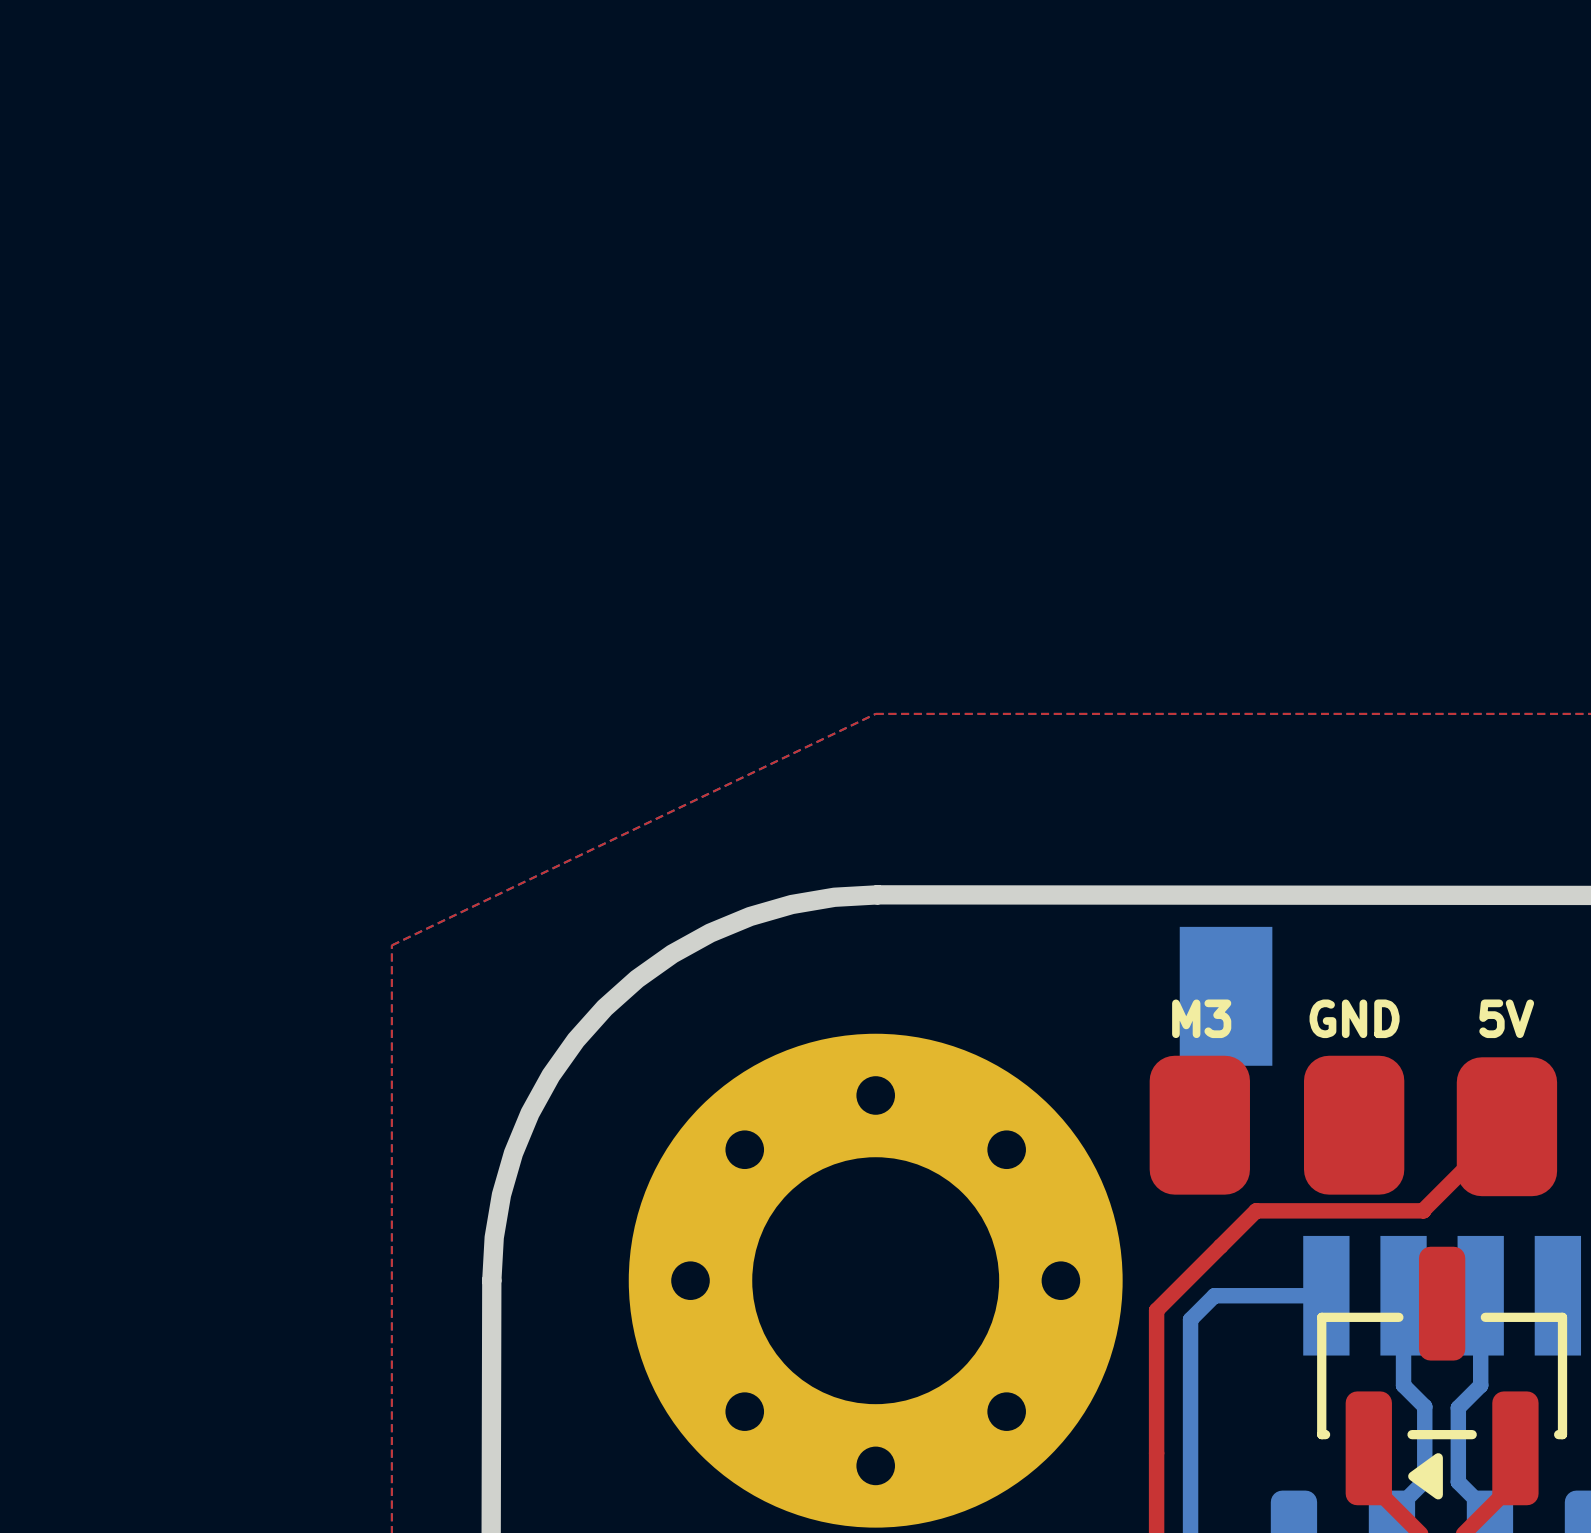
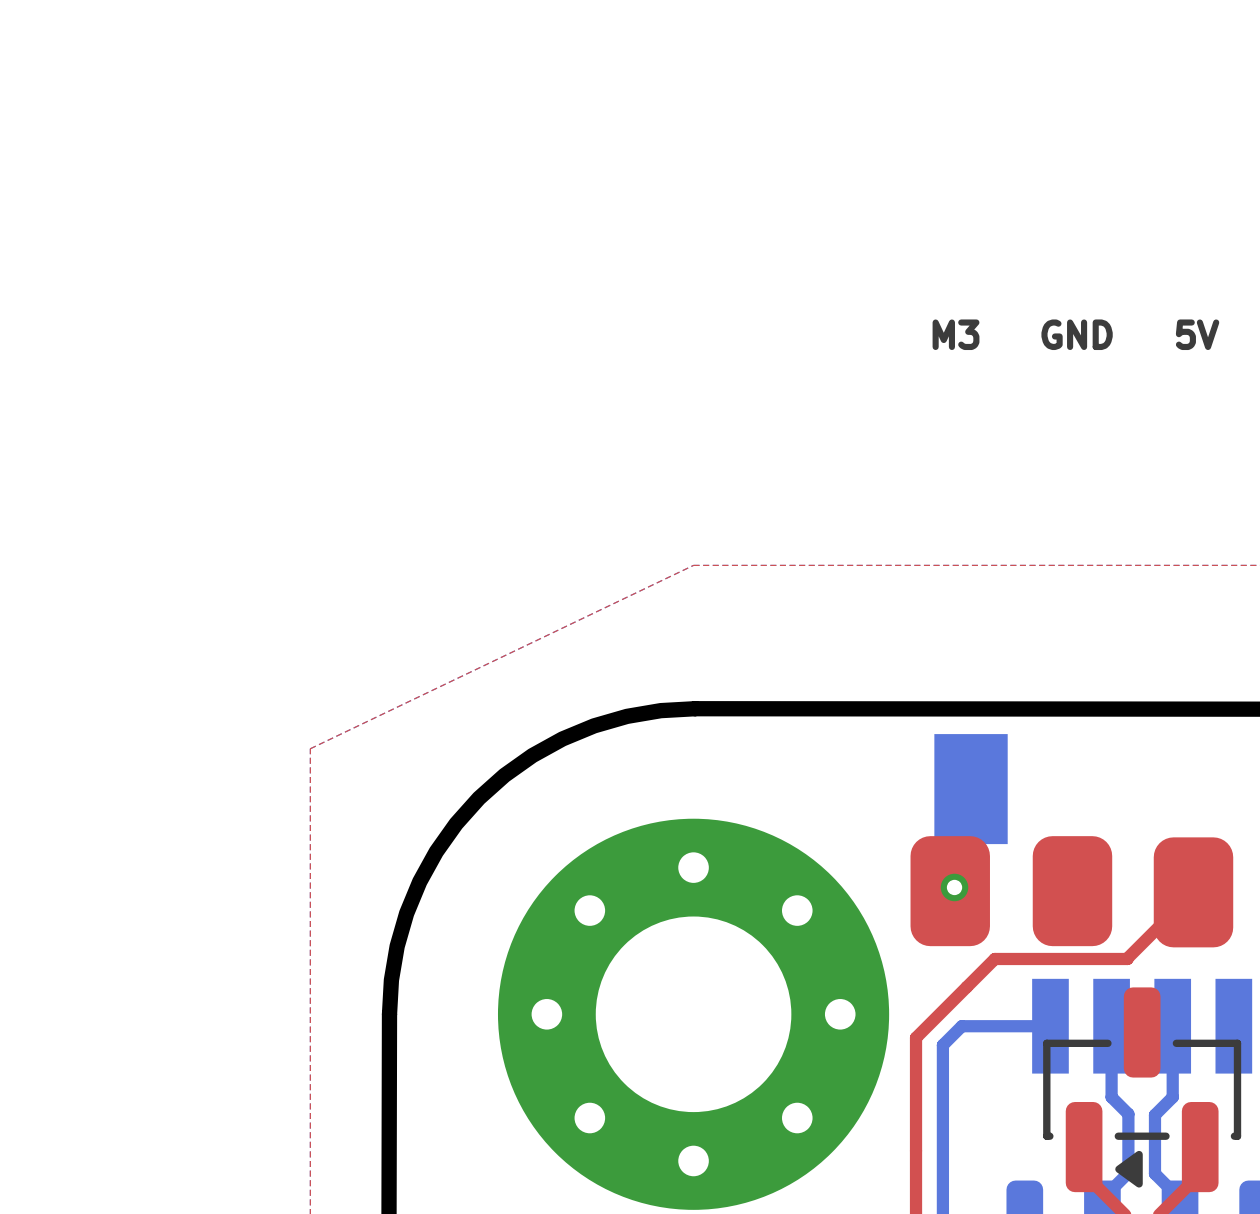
text position: M3 (1201, 1018) -> M3 (956, 334)
text position: GND (1354, 1018) -> GND (1077, 334)
text position: 5V (1506, 1018) -> 5V (1197, 334)
via: none -> (954, 887)

